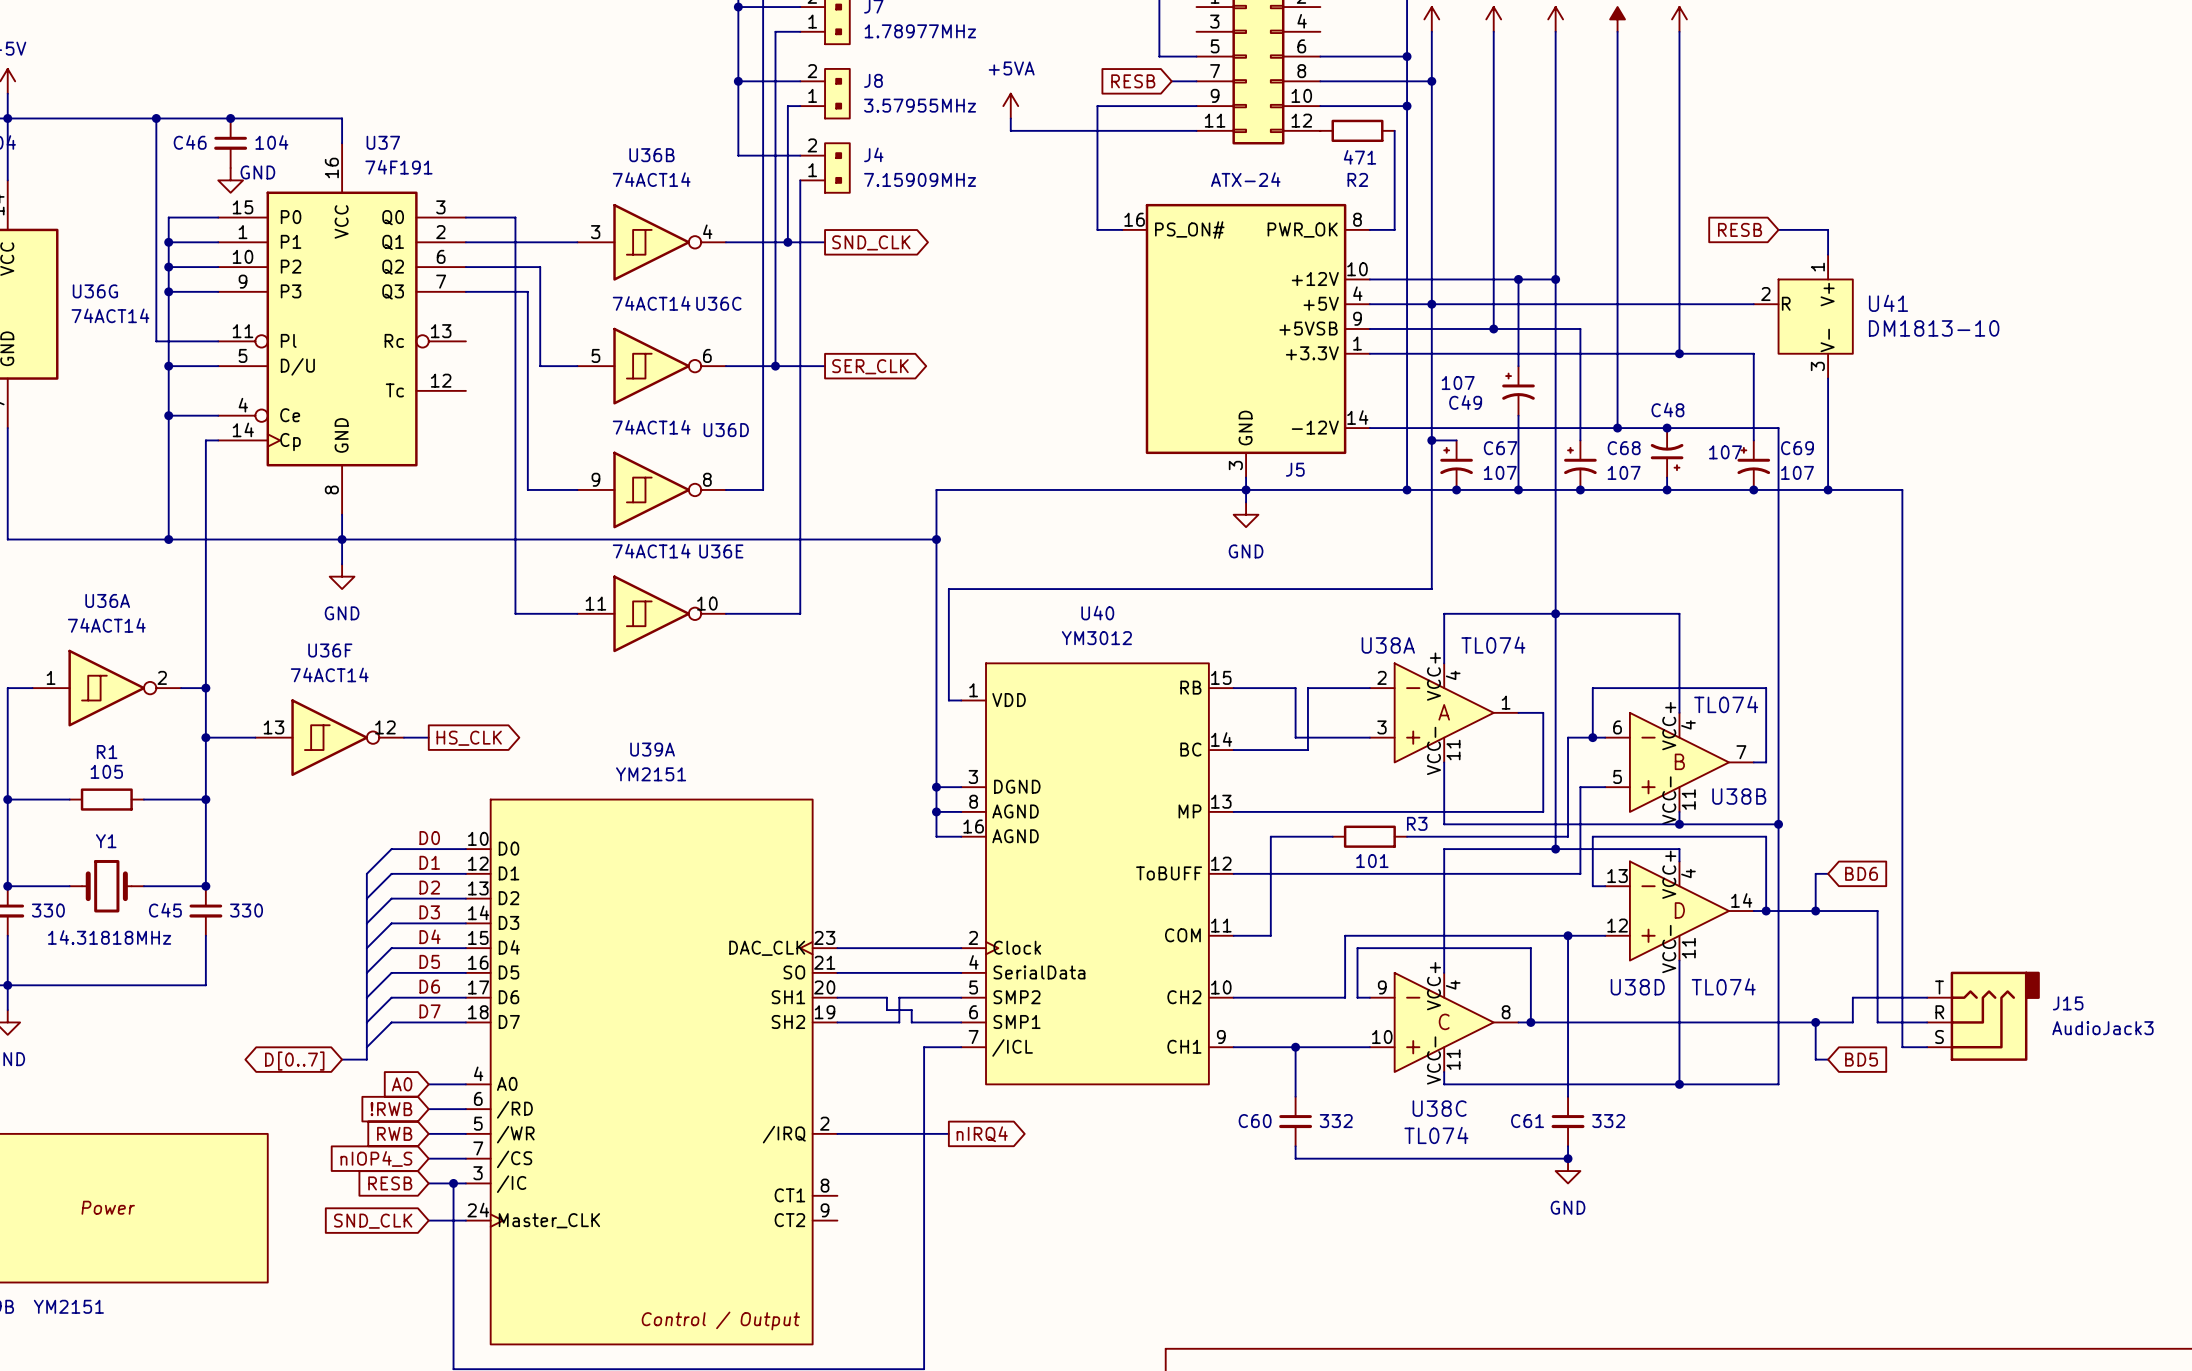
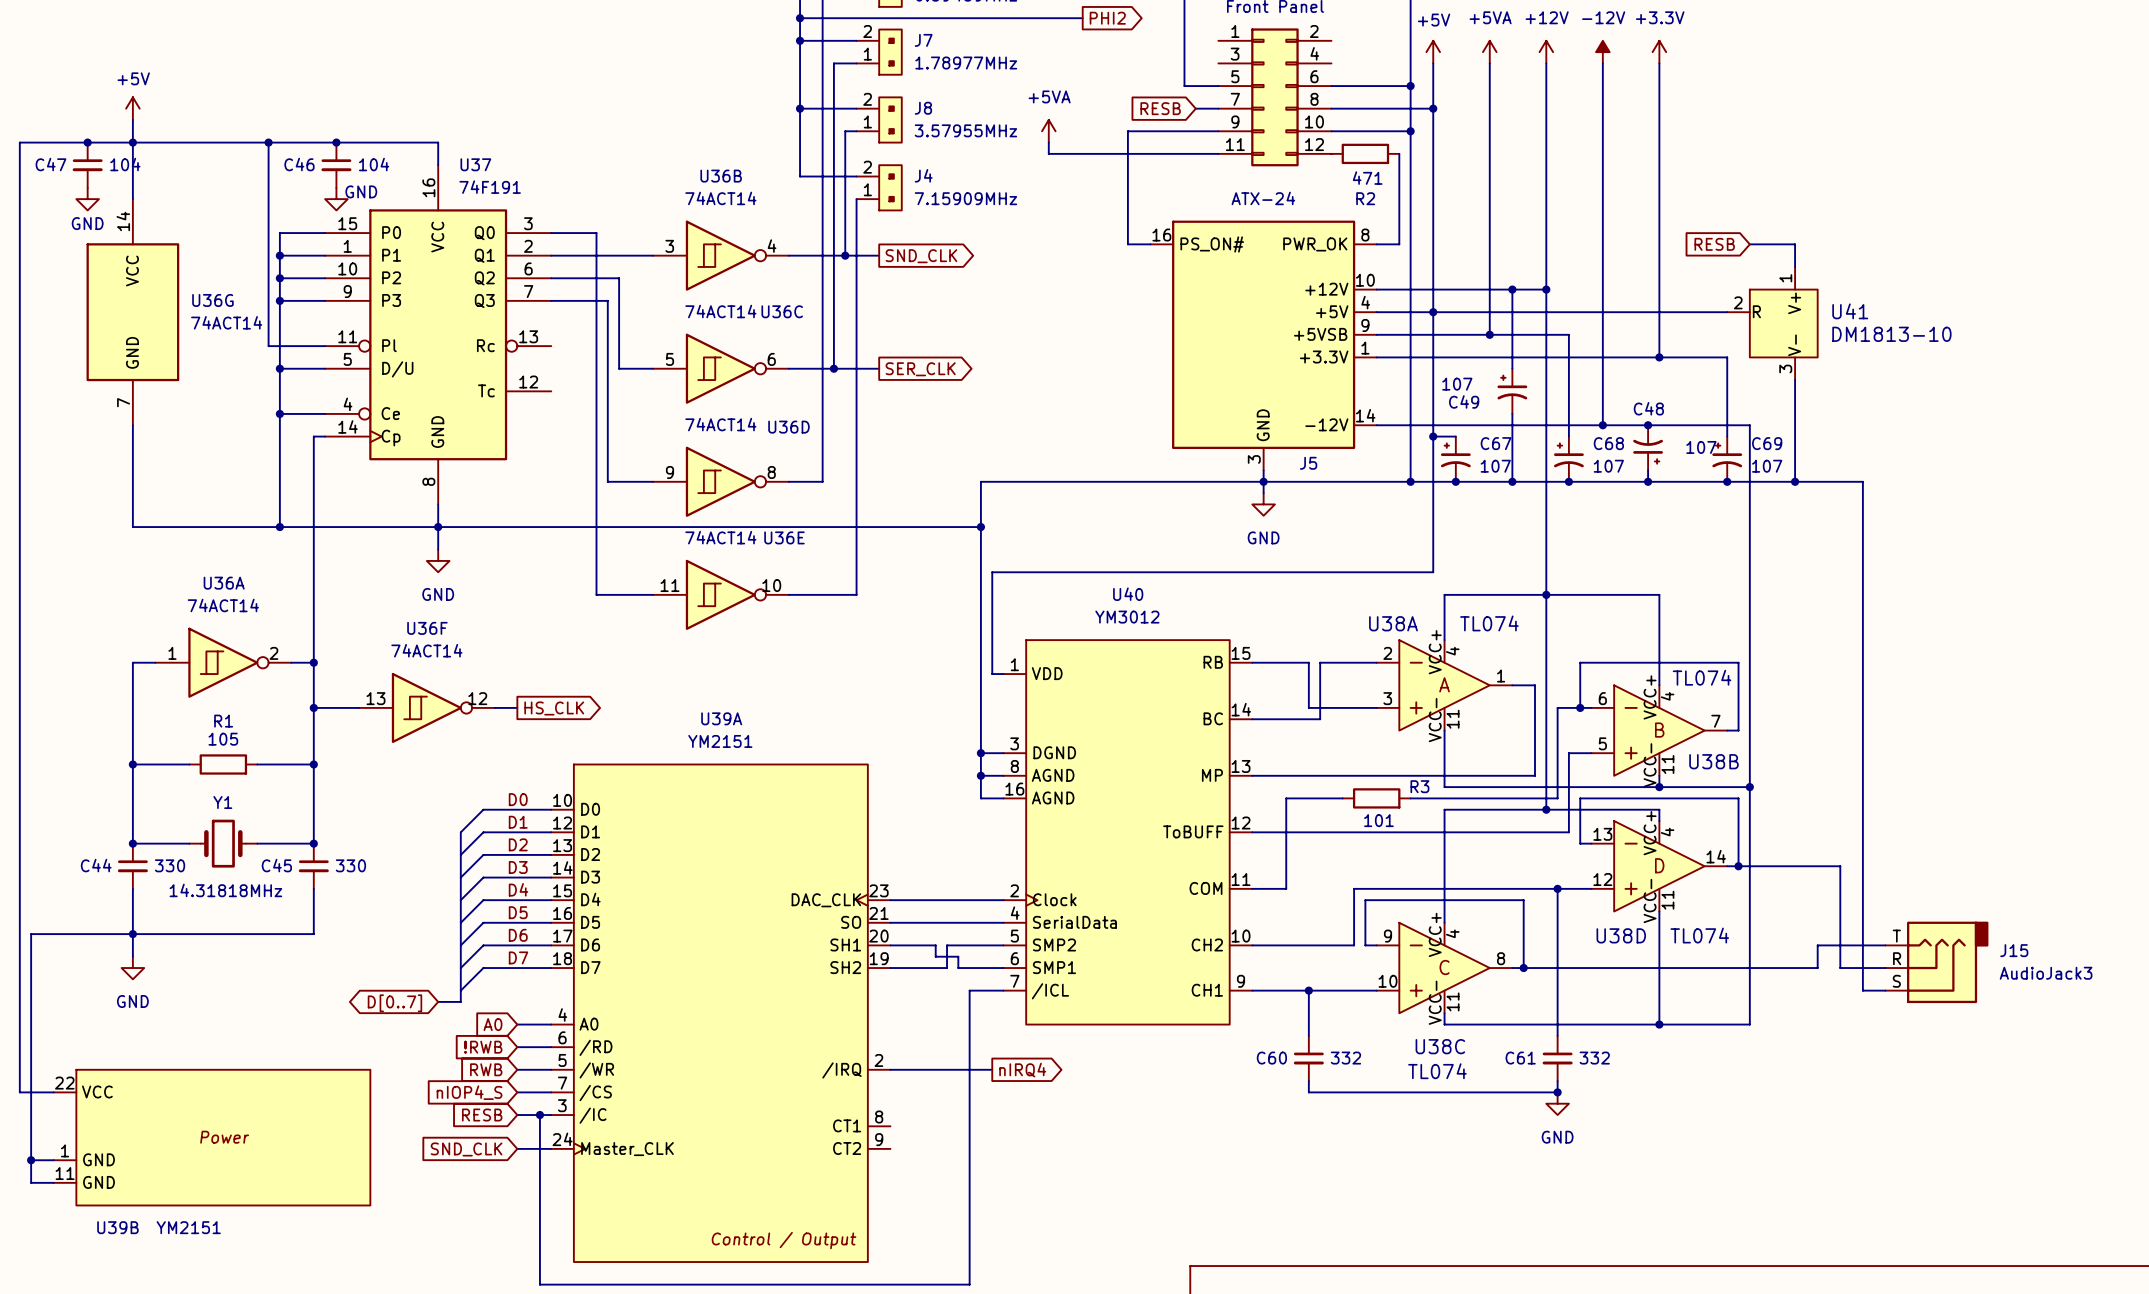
wire: (1828, 873) (1815, 873) (1815, 911) -> none
global label: BD6 (1861, 873) -> none
junction: (1815, 911) -> none
wire: (1815, 1022) (1815, 1059) (1828, 1059) -> none
junction: (1815, 1022) -> none
global label: BD5 (1861, 1059) -> none

